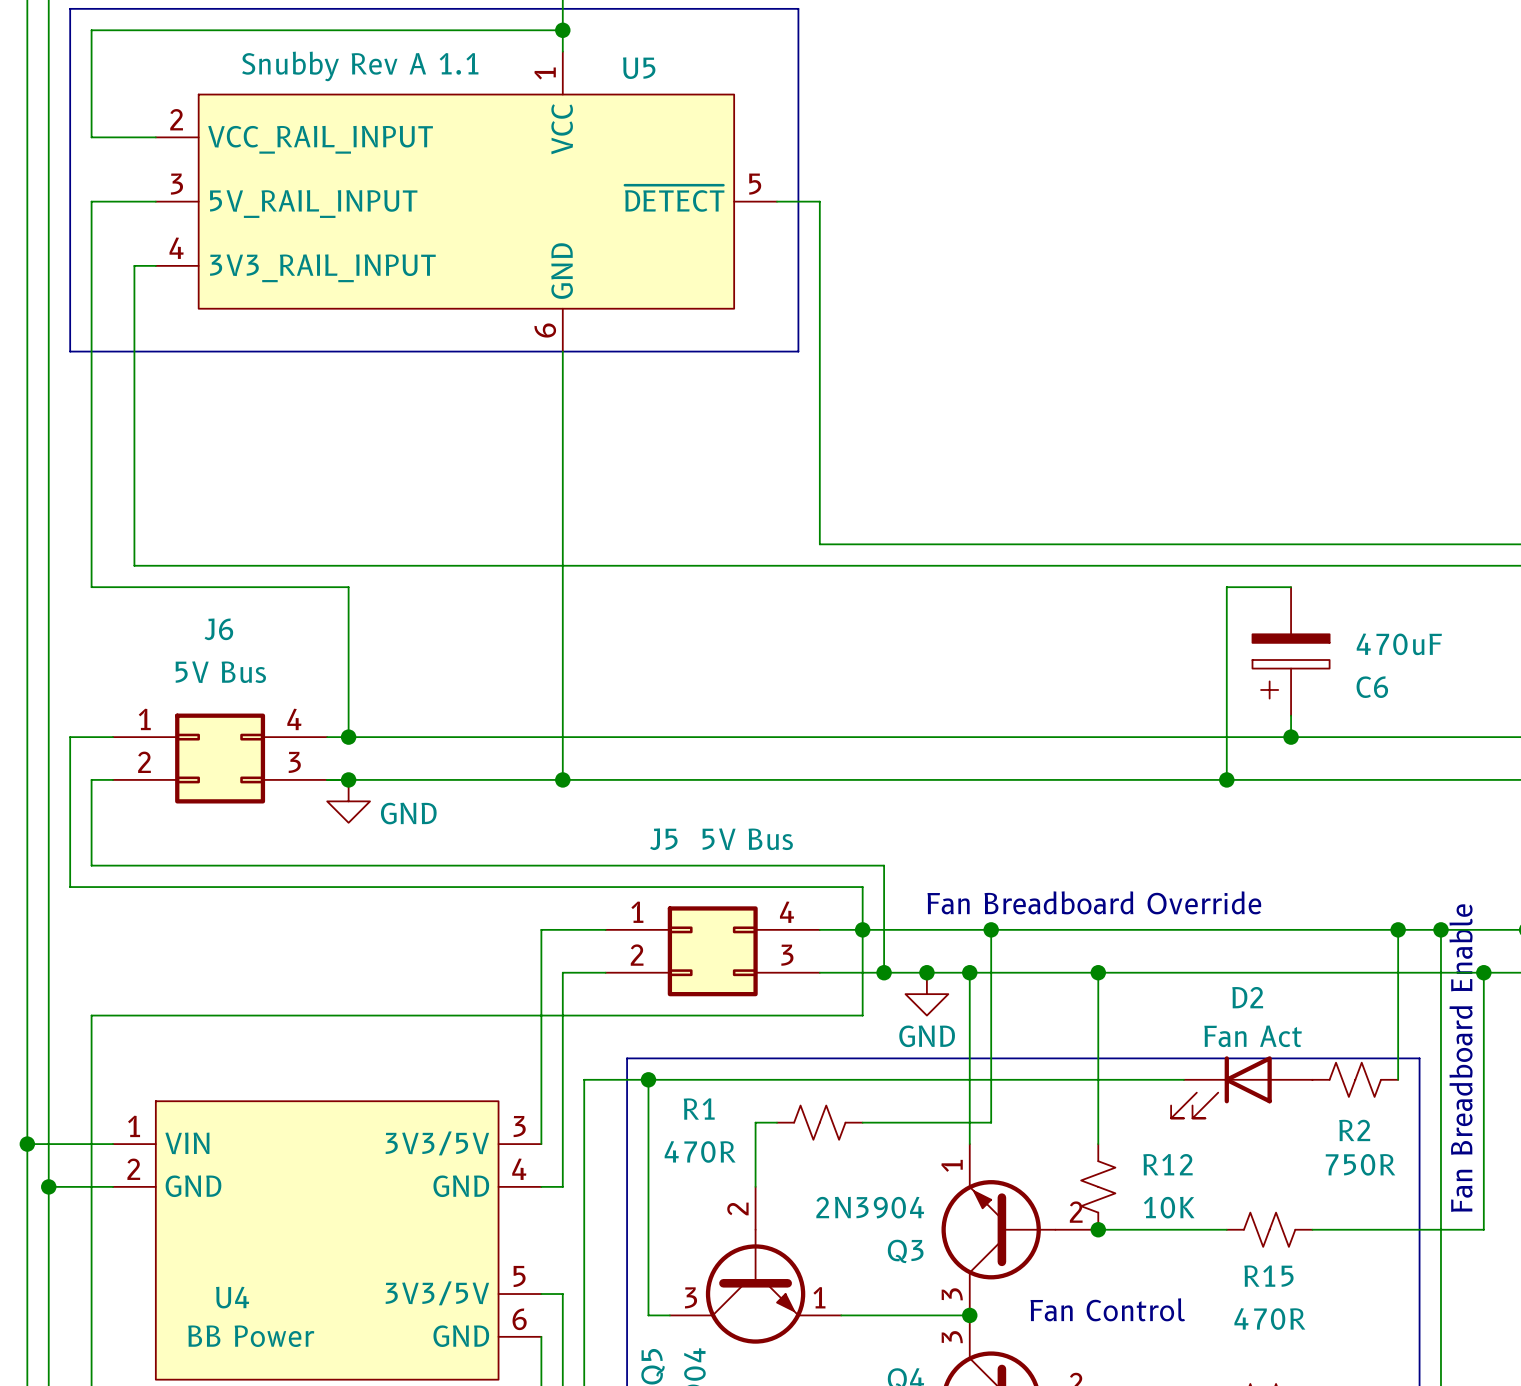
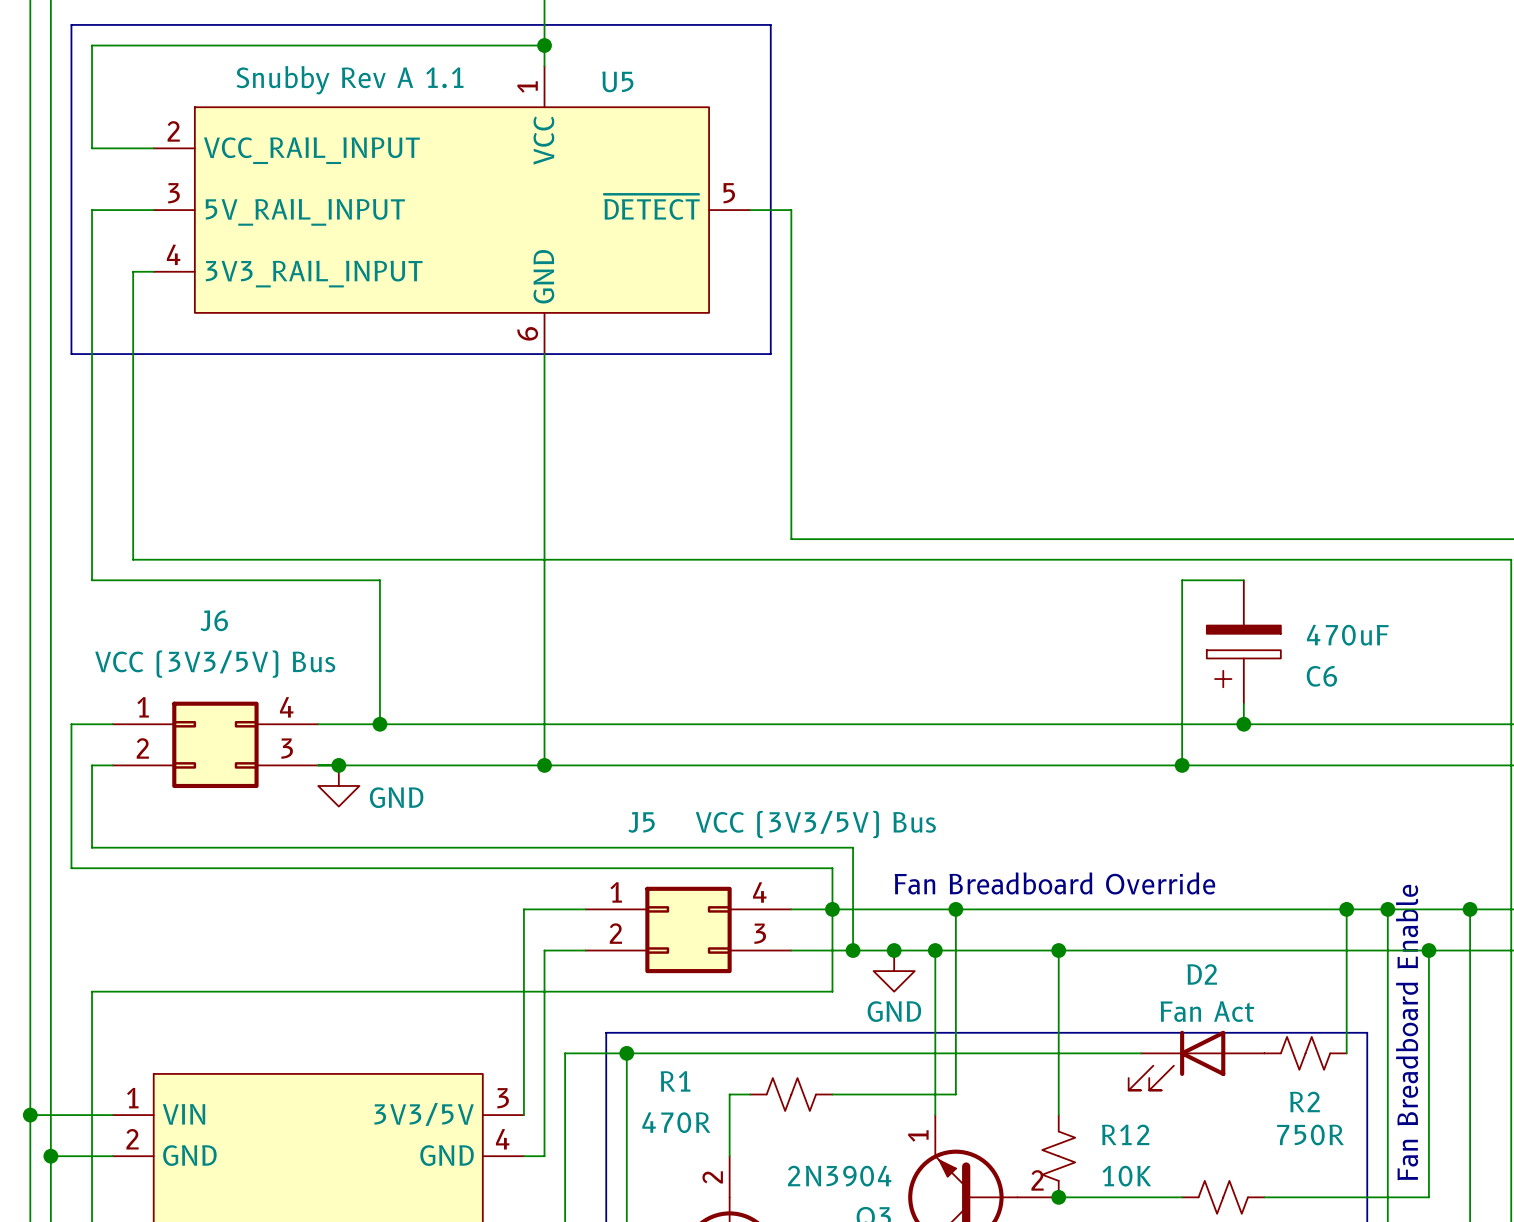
wire: (348, 587) (348, 737) -> (338, 580) (379, 580) (379, 724)
J6 value: 5V Bus (220, 672) -> VCC (3V3/5V) Bus (215, 664)
junction position: (348, 737) -> (379, 724)
J5 value: 5V Bus (747, 839) -> VCC (3V3/5V) Bus (815, 824)

